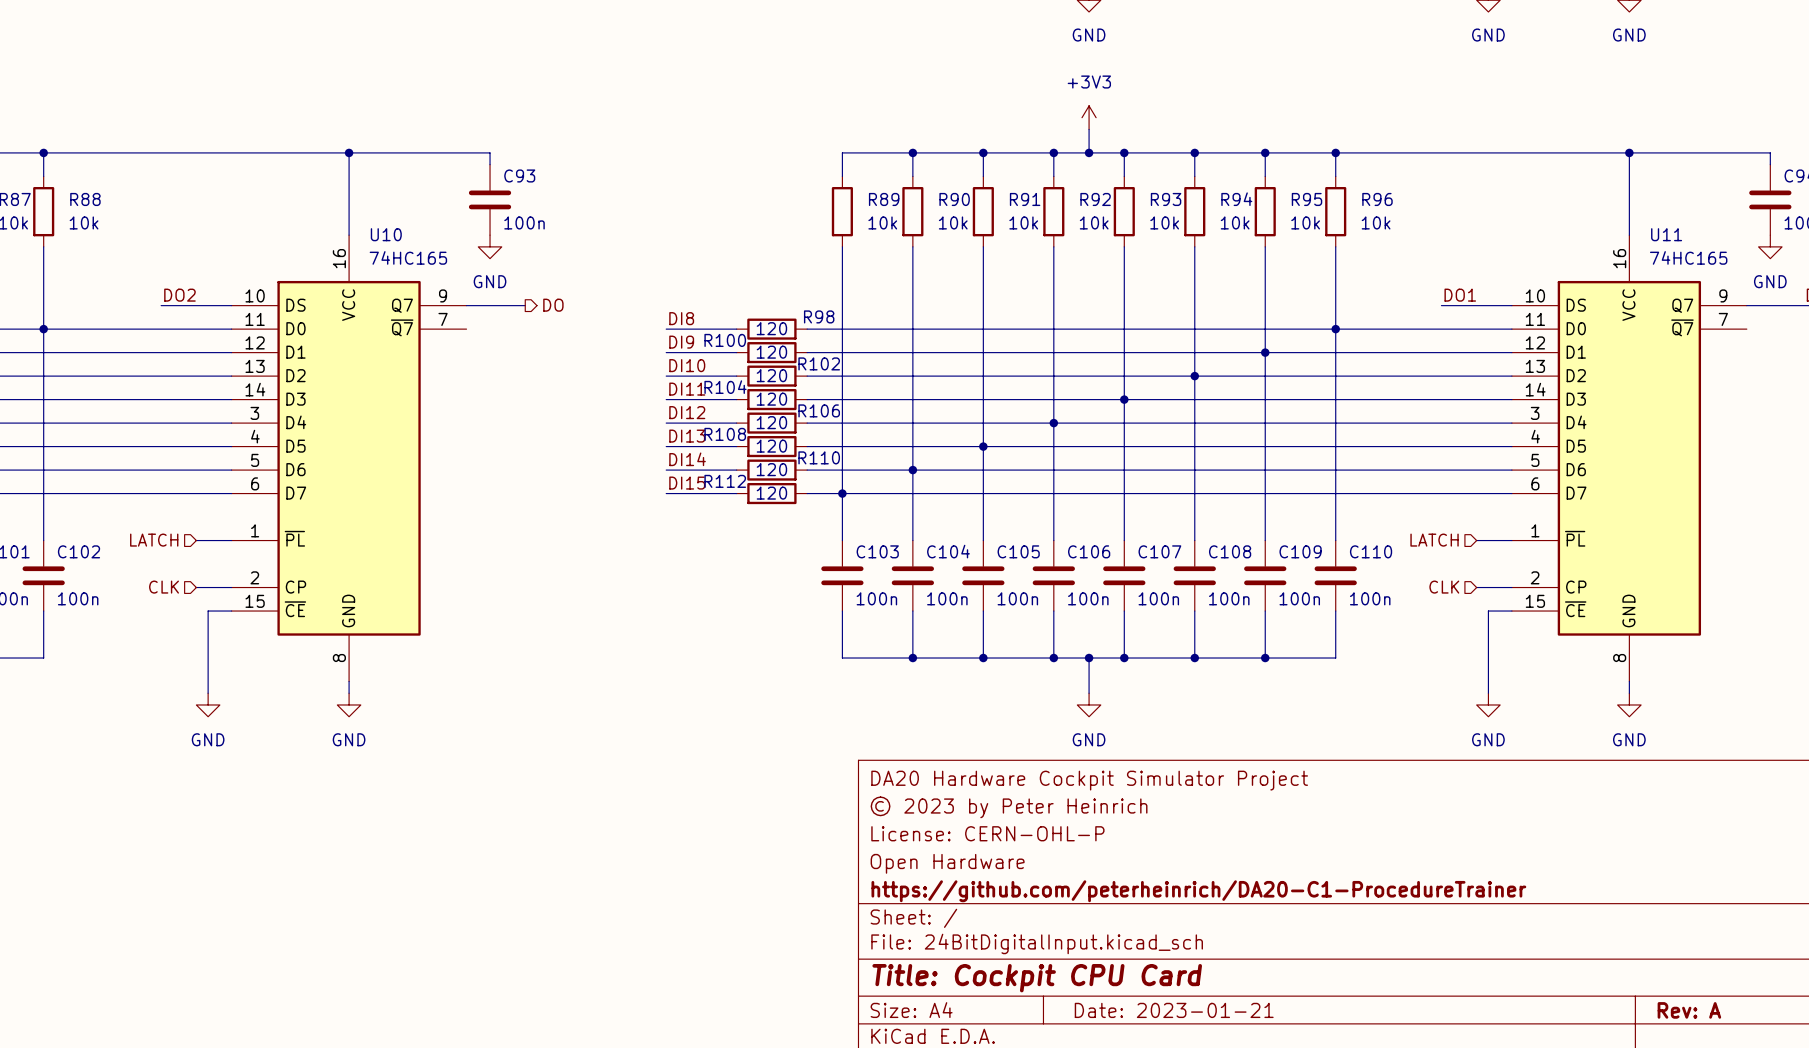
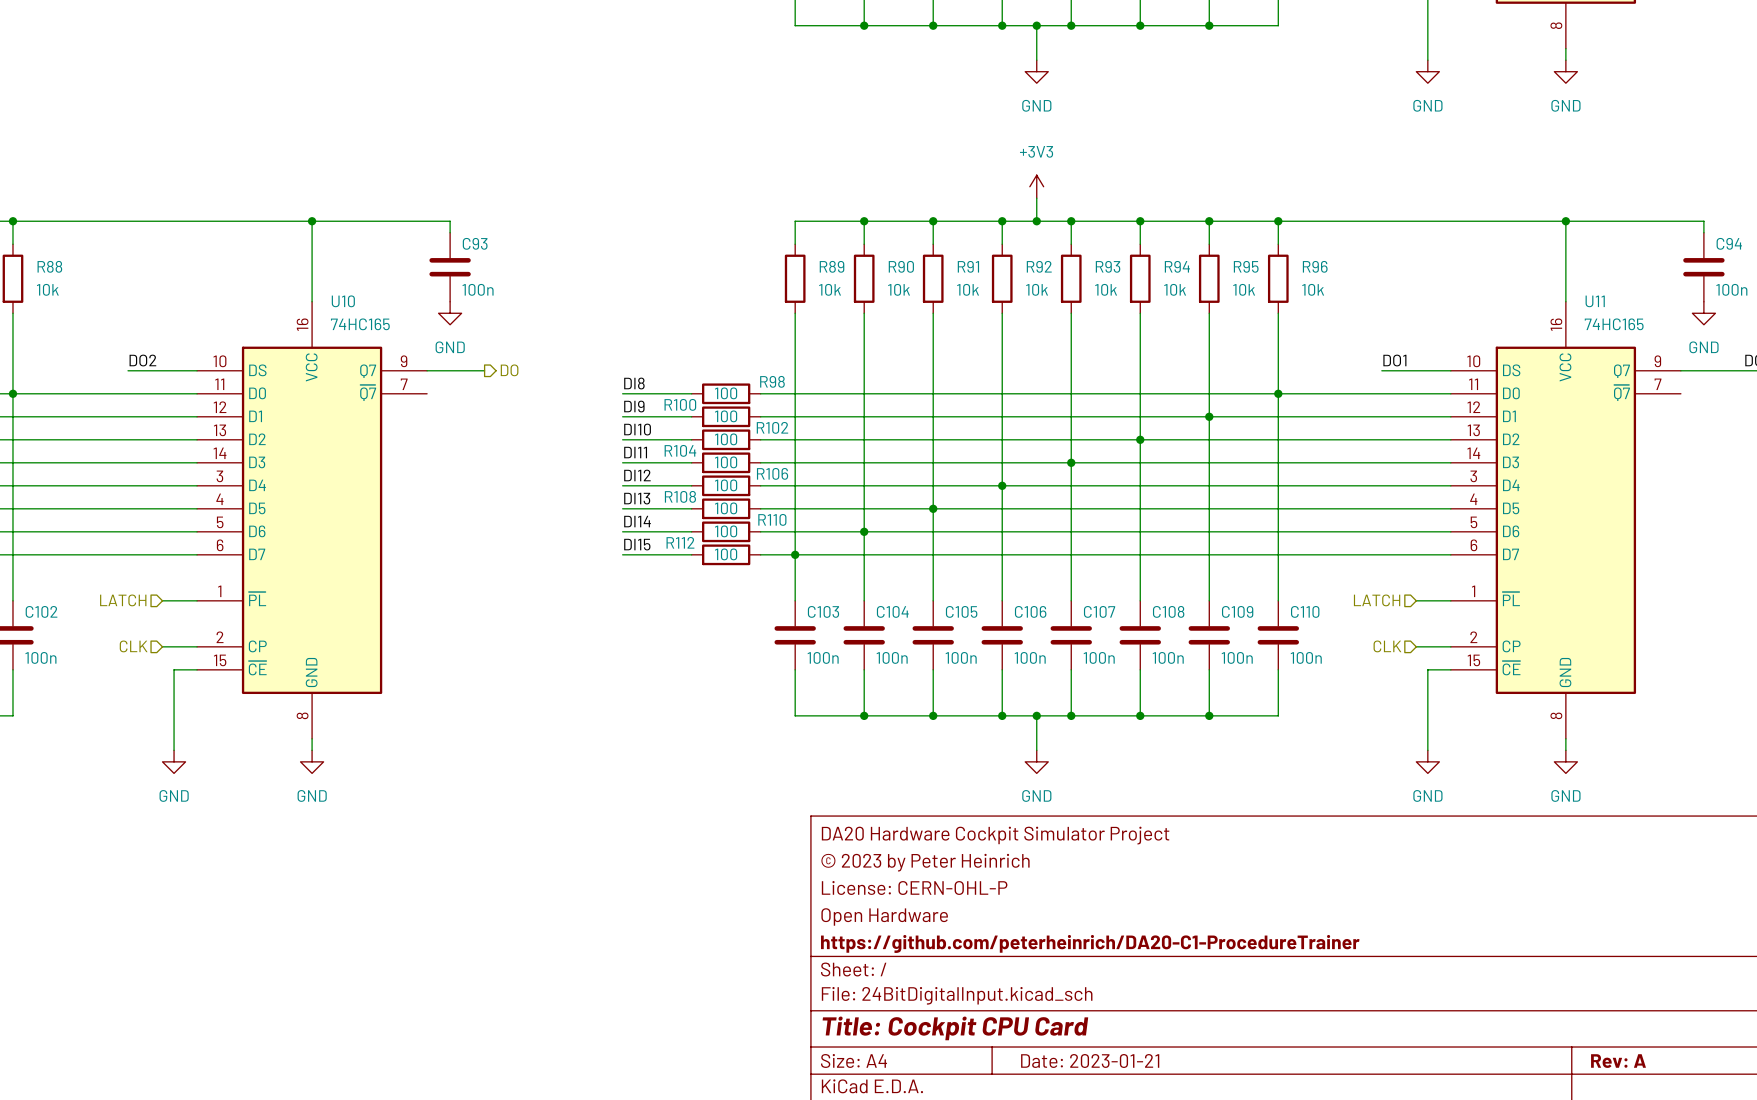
R98 value: 120 (771, 328) -> 100 (726, 393)
R100 value: 120 (771, 352) -> 100 (726, 416)
R102 value: 120 (771, 375) -> 100 (726, 439)
R104 value: 120 (771, 399) -> 100 (726, 462)
R106 value: 120 (771, 422) -> 100 (726, 485)
R108 value: 120 (771, 446) -> 100 (726, 508)
R110 value: 120 (771, 469) -> 100 (726, 531)
R112 value: 120 (771, 493) -> 100 (726, 554)

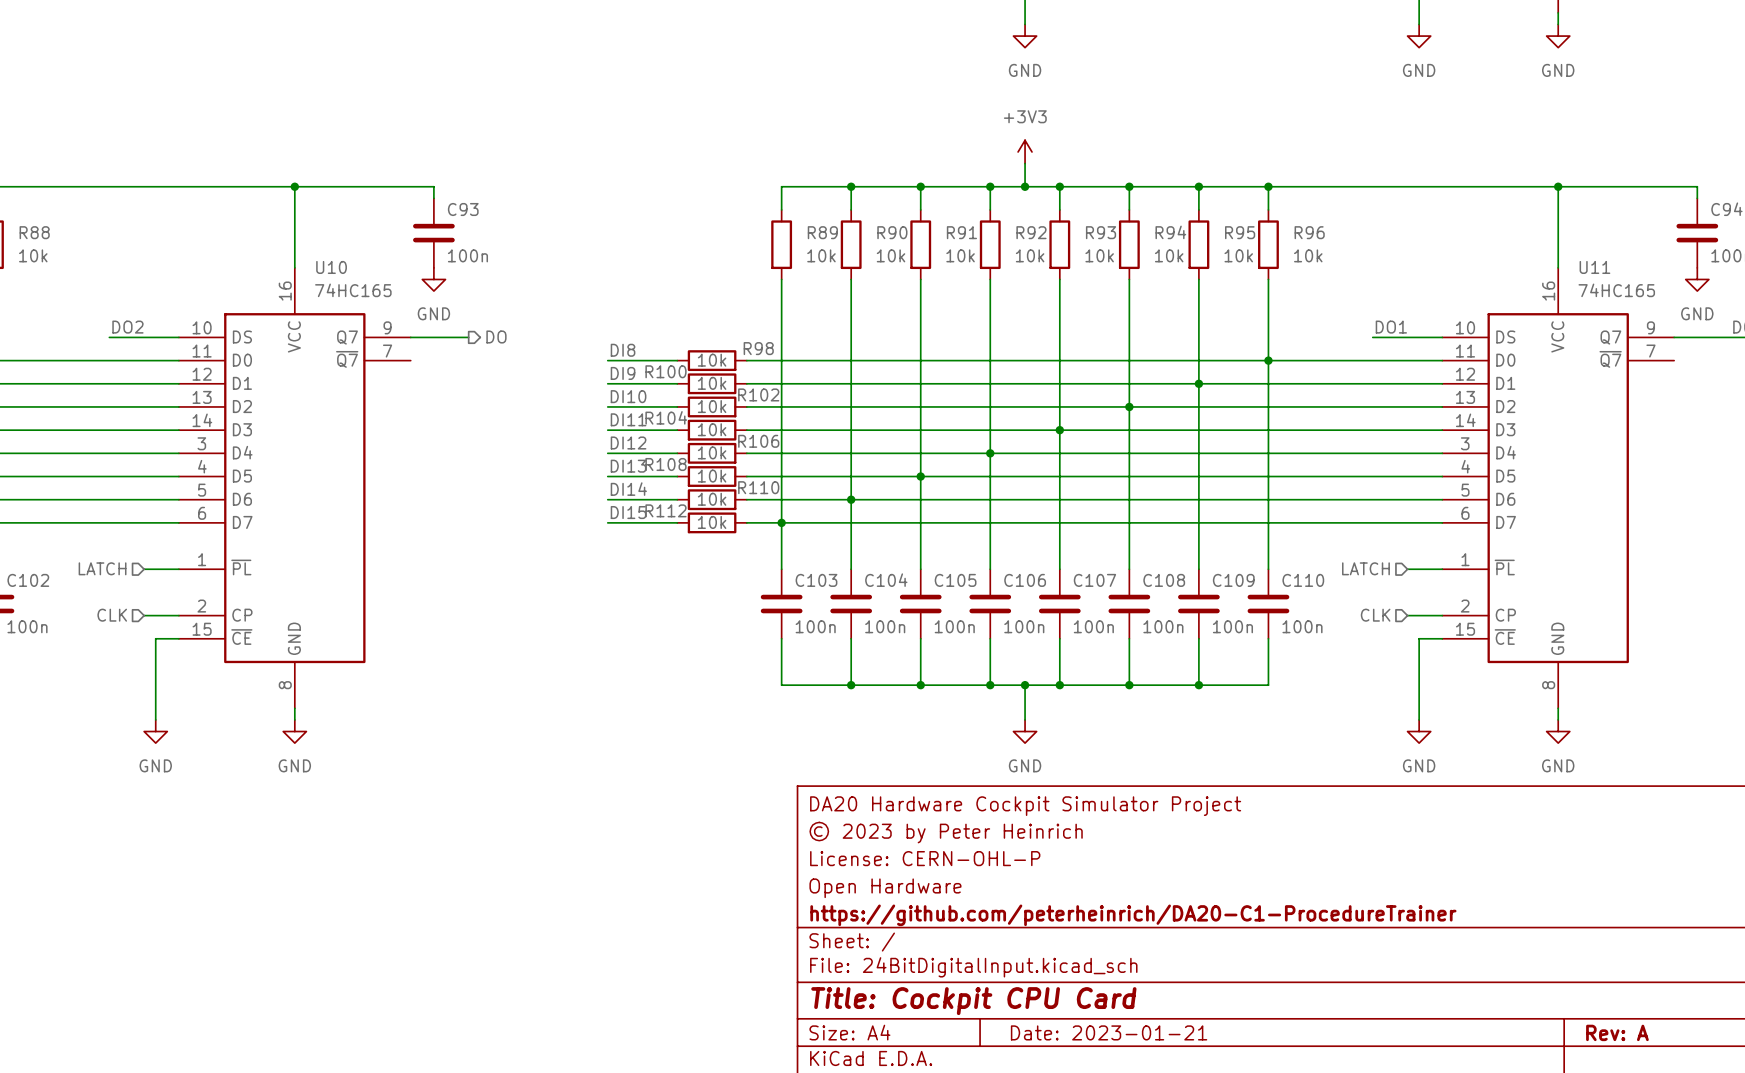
R98 value: 100 (726, 393) -> 10k (712, 360)
R100 value: 100 (726, 416) -> 10k (712, 383)
R102 value: 100 (726, 439) -> 10k (712, 406)
R104 value: 100 (726, 462) -> 10k (712, 429)
R106 value: 100 (726, 485) -> 10k (712, 452)
R108 value: 100 (726, 508) -> 10k (712, 476)
R110 value: 100 (726, 531) -> 10k (712, 499)
R112 value: 100 (726, 554) -> 10k (712, 522)

